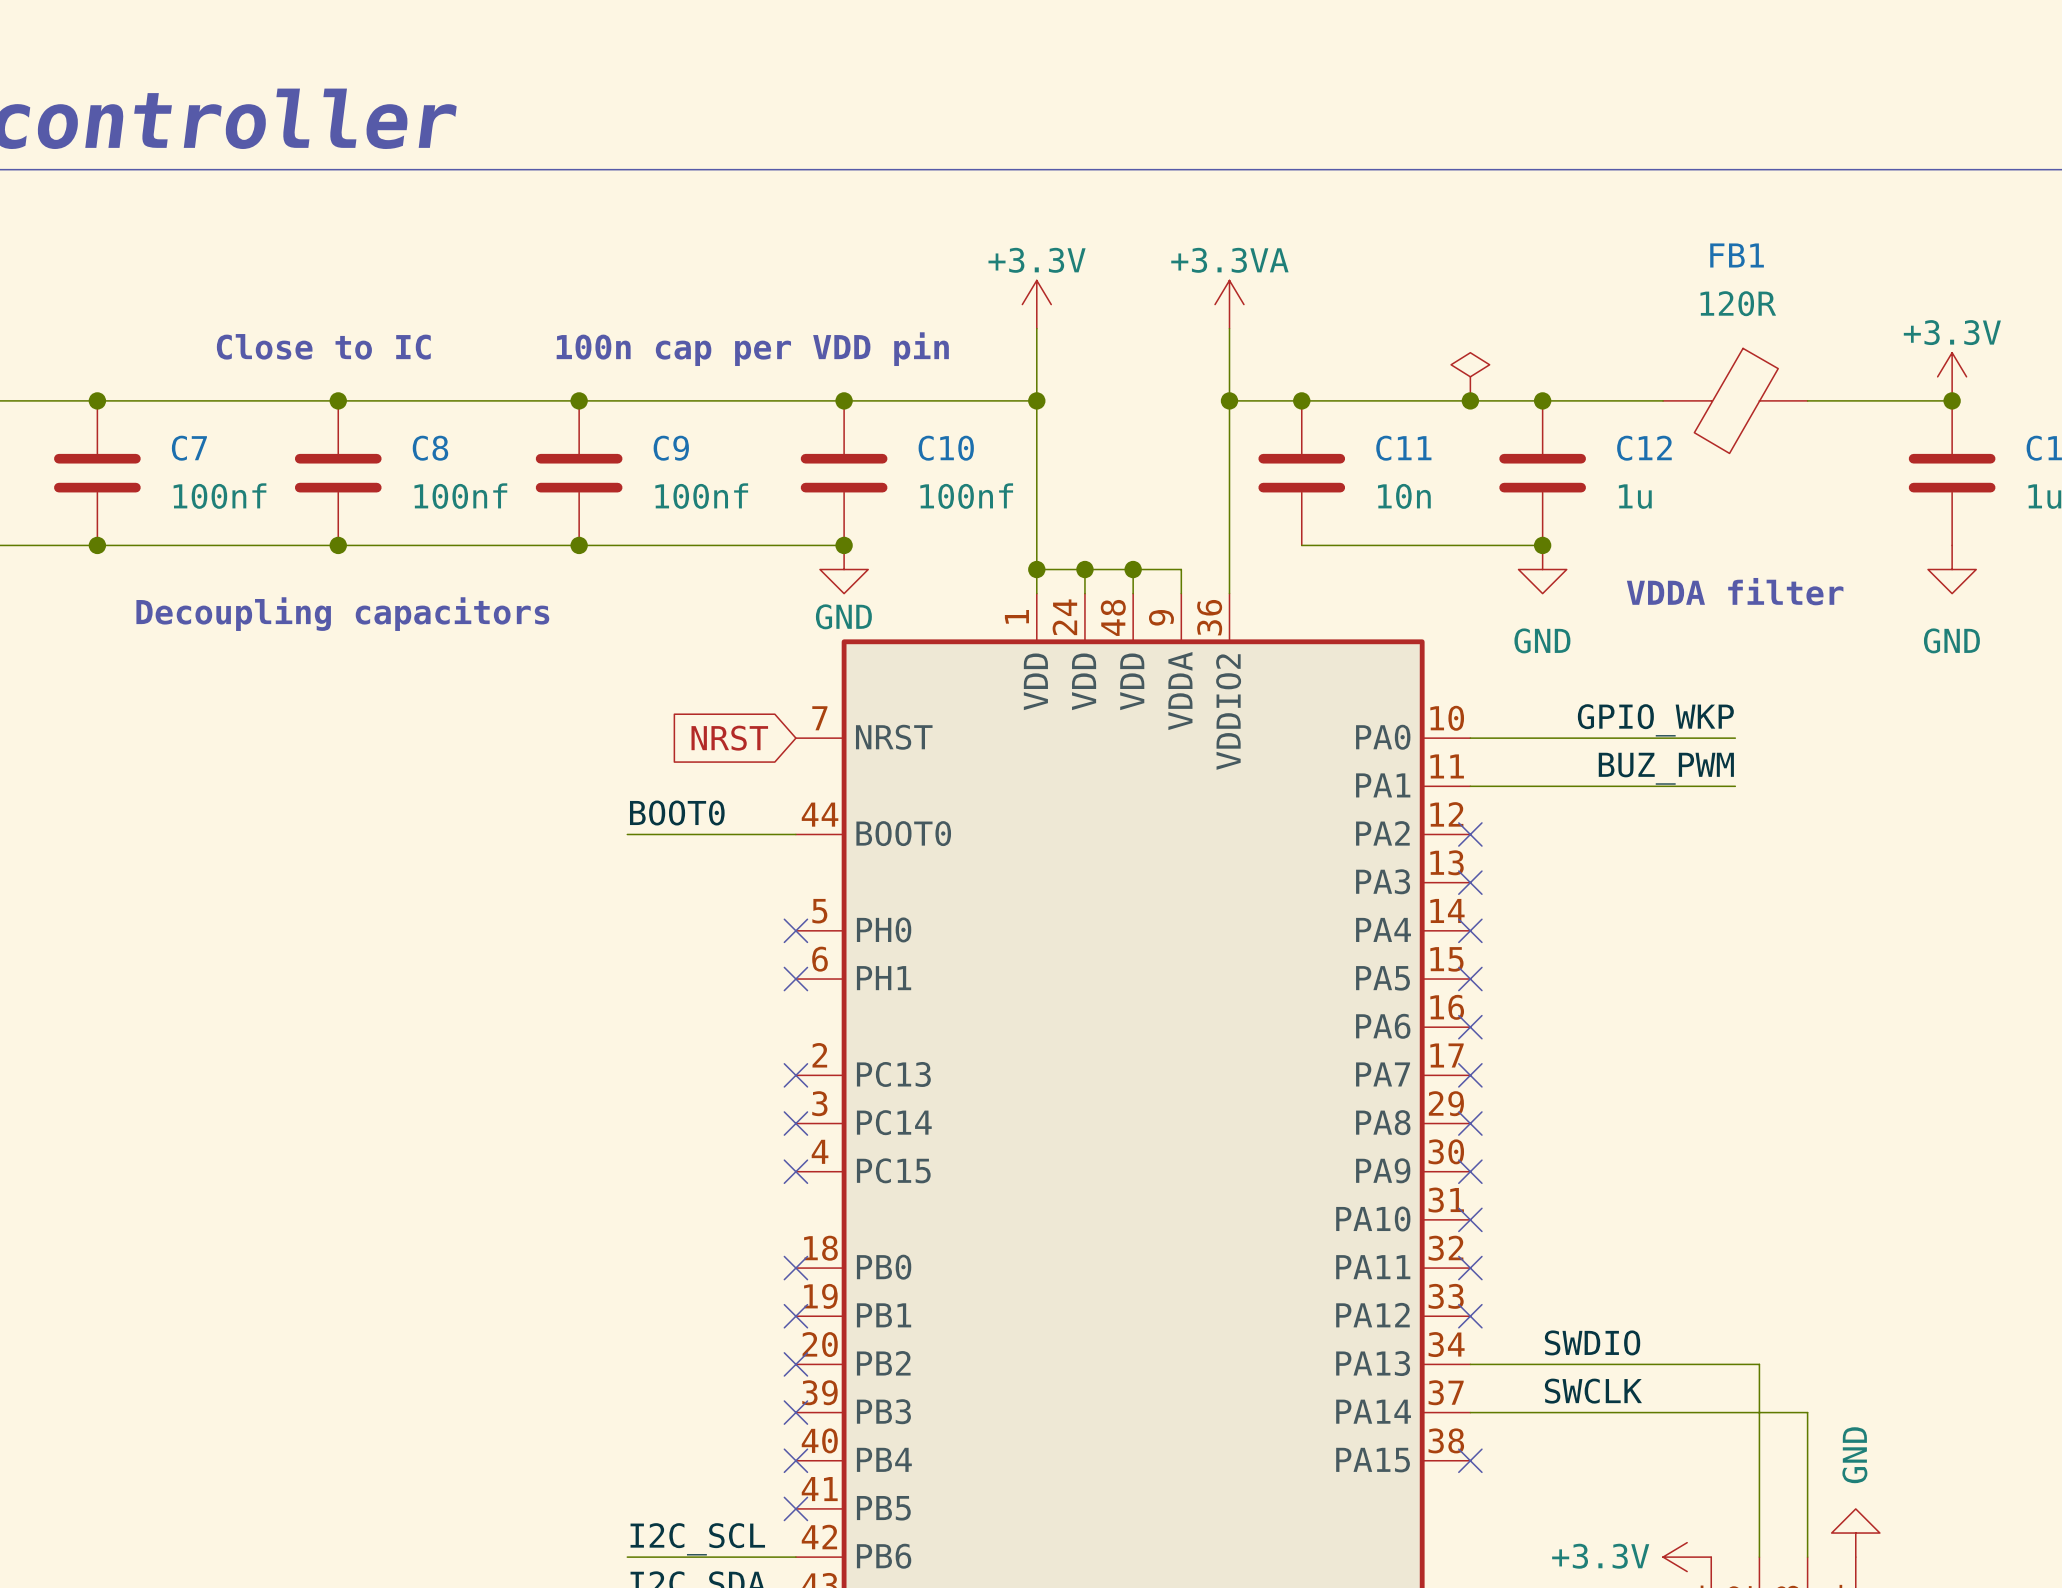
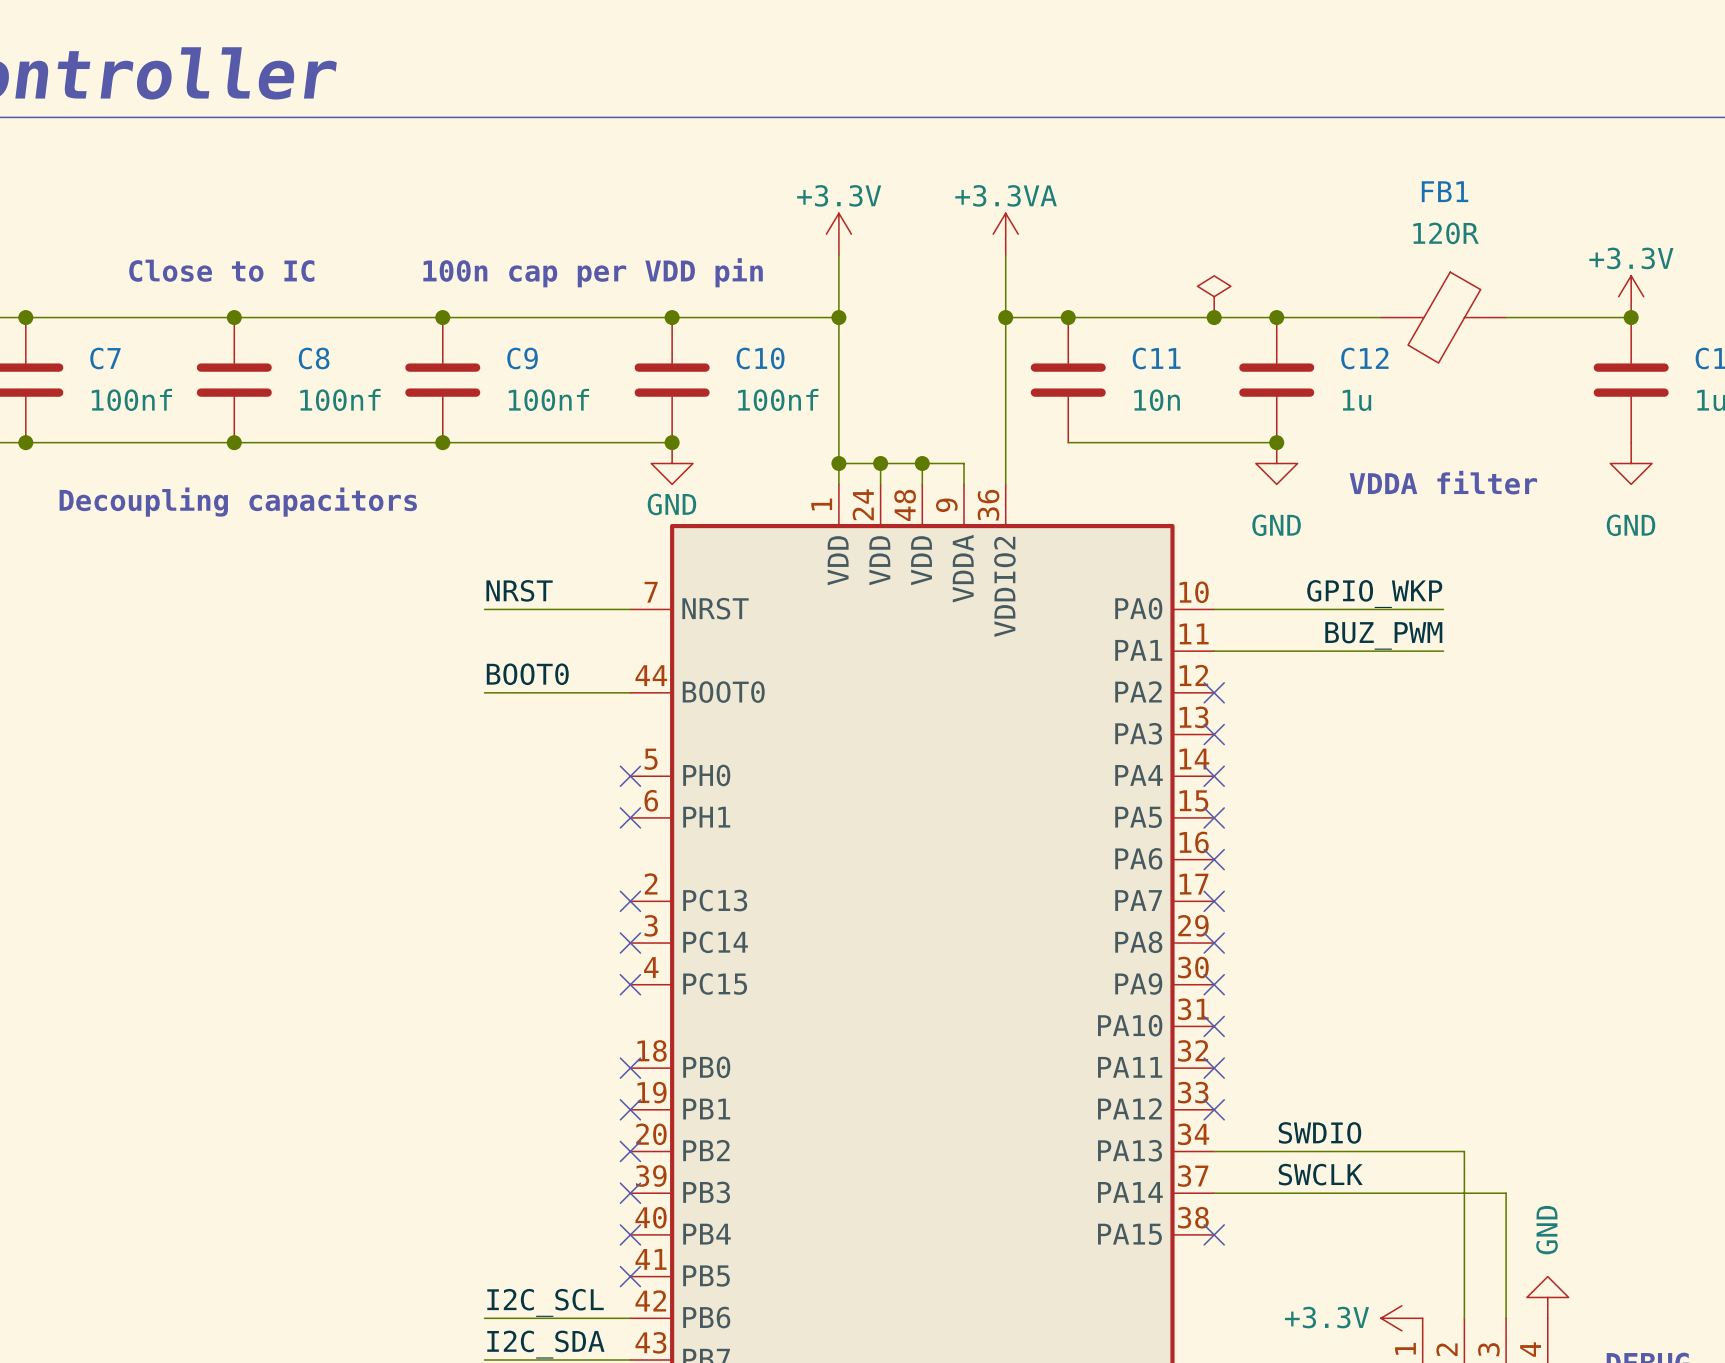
label: none -> NRST (519, 590)
wire: none -> (484, 609) (630, 609)
global label: NRST (729, 738) -> none

